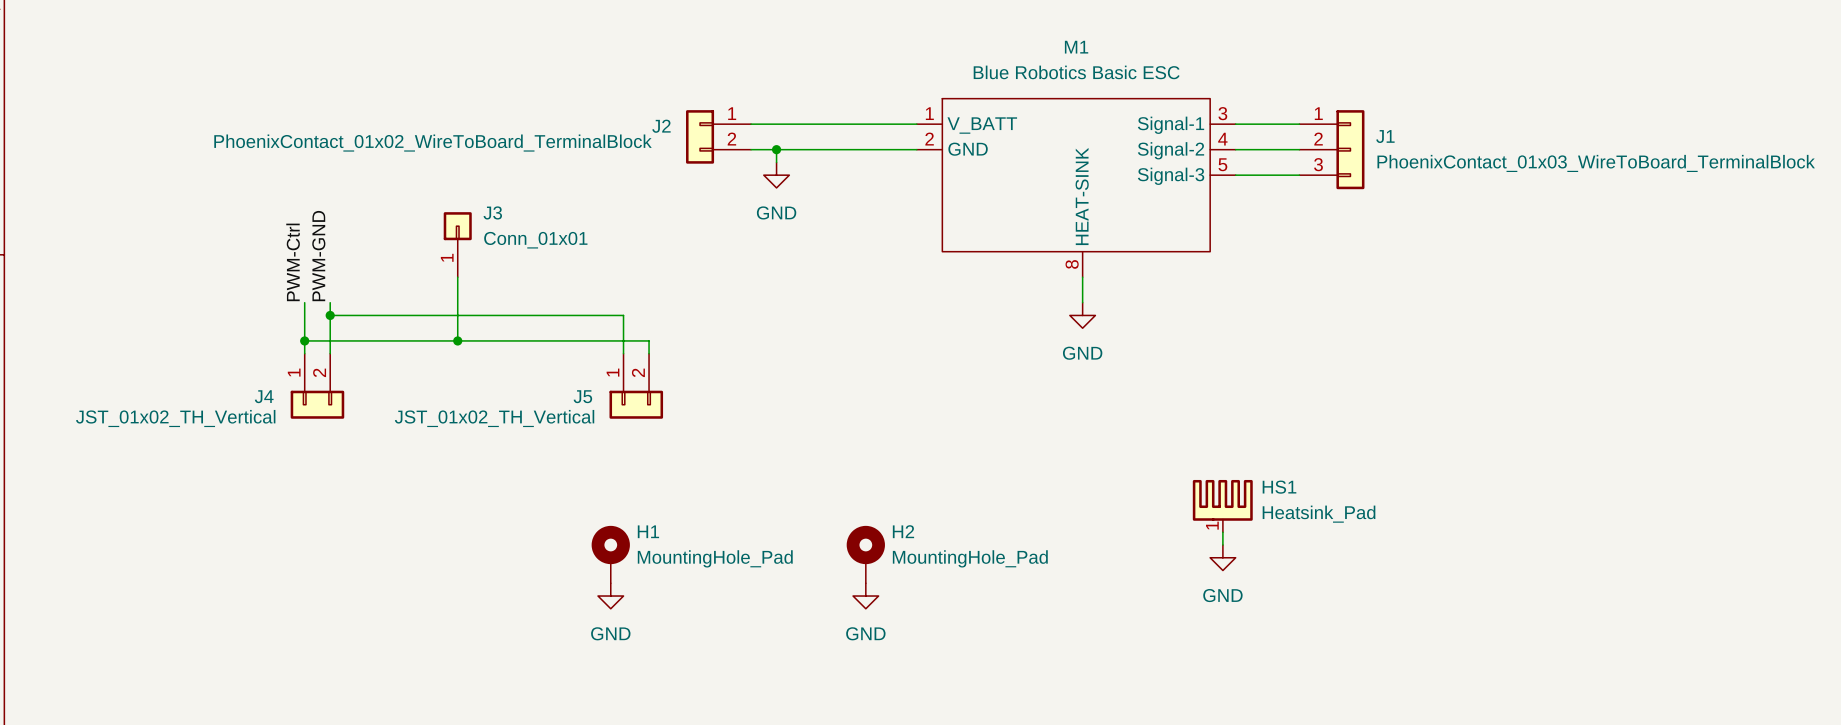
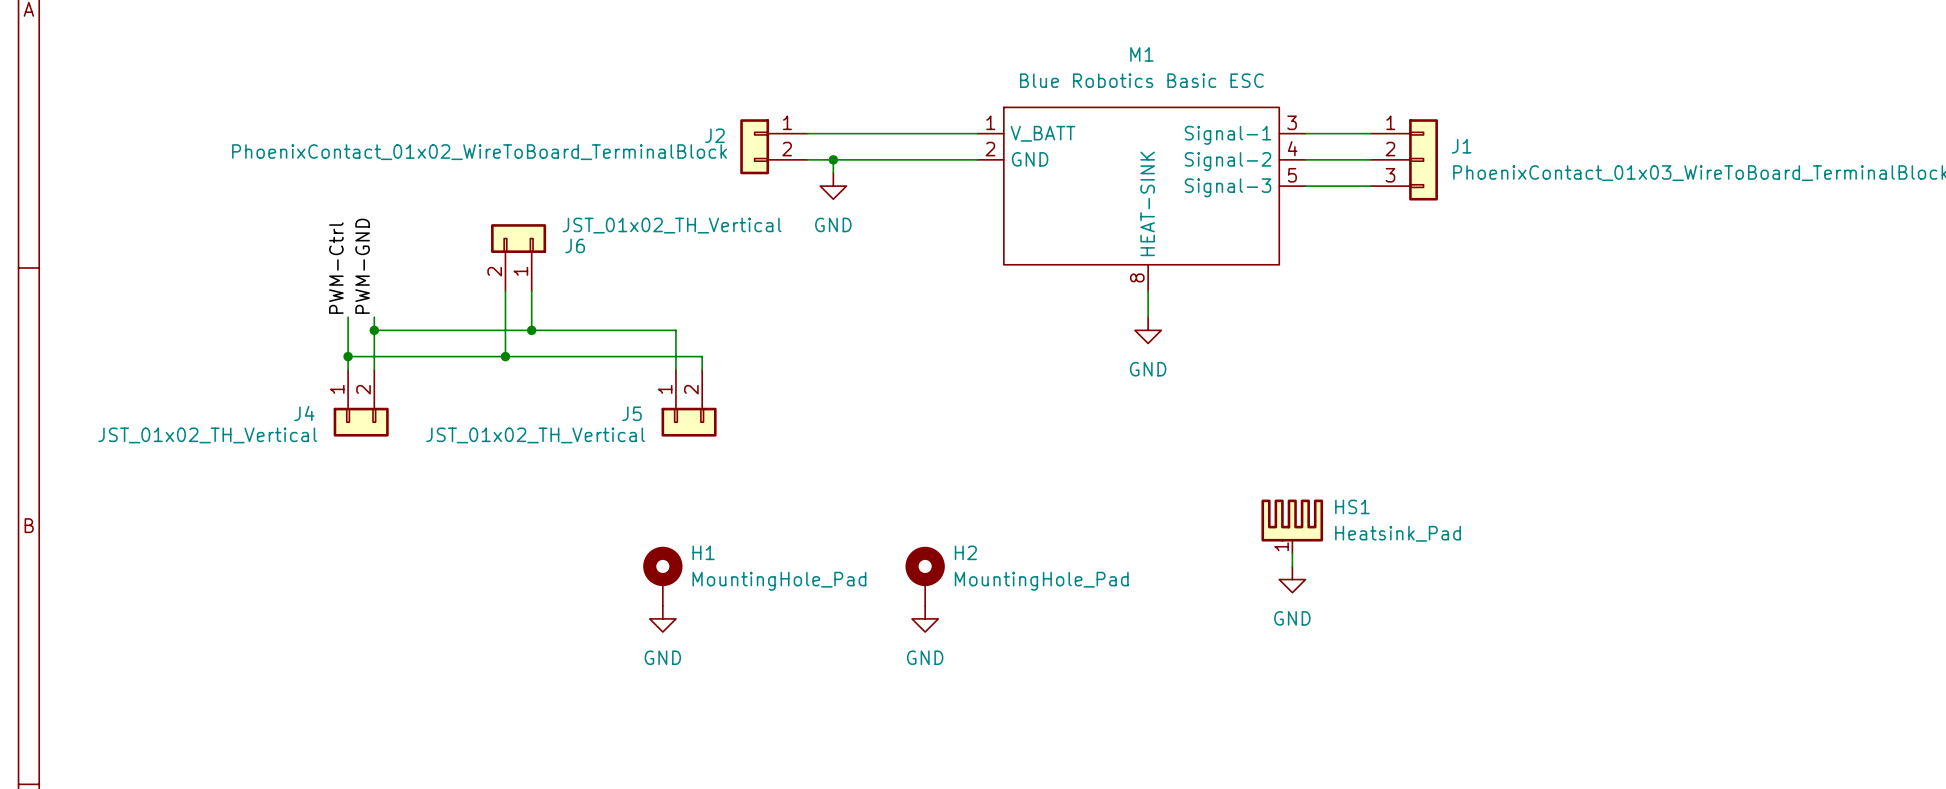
J3: Conn_01x01 (457, 244) -> none
J6: none -> JST_01x02_TH_Vertical (518, 257)
wire: none -> (531, 291) (531, 330)
junction: none -> (531, 330)

